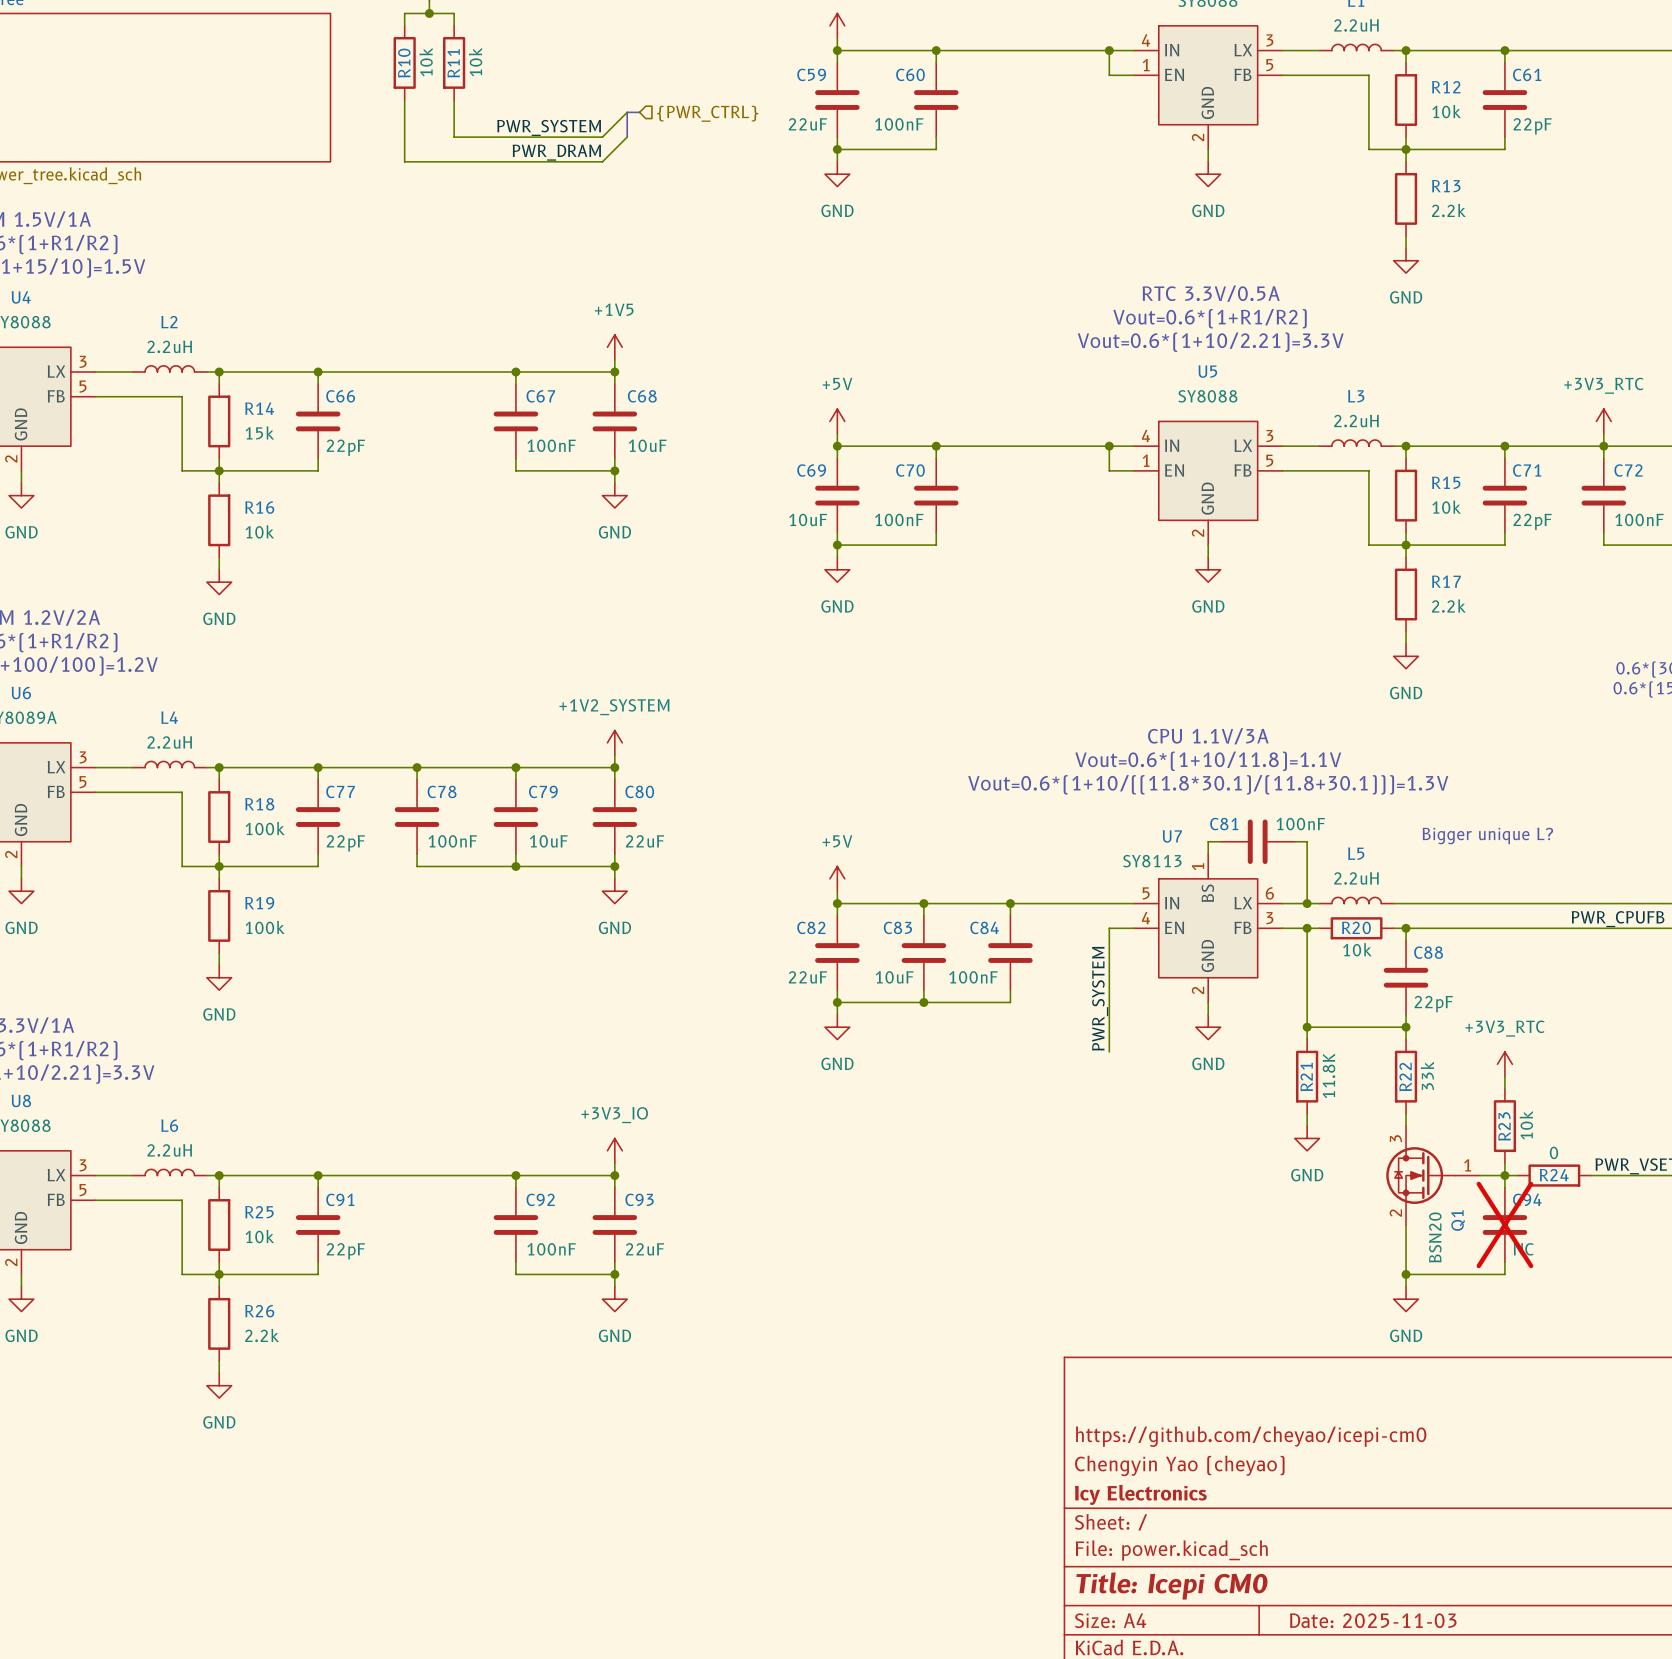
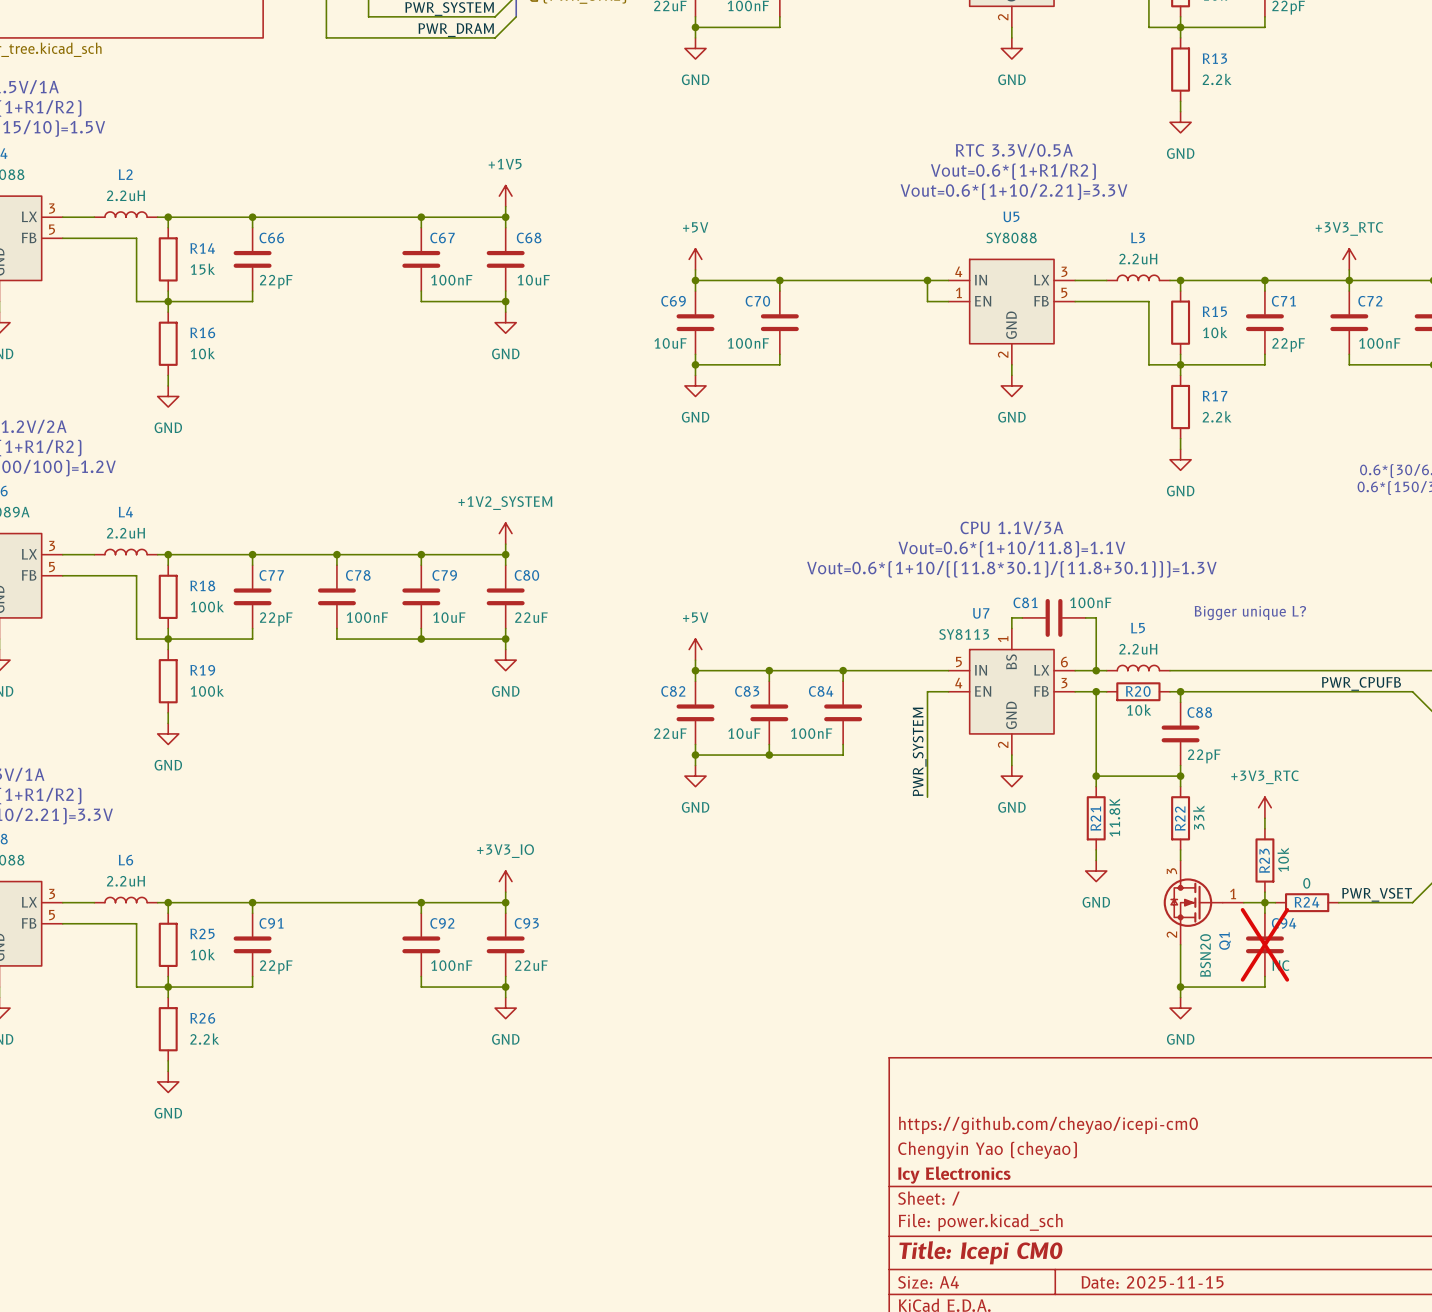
title block: Date: 2025-11-03 (1373, 1620) -> Date: 2025-11-15 (1152, 1282)

